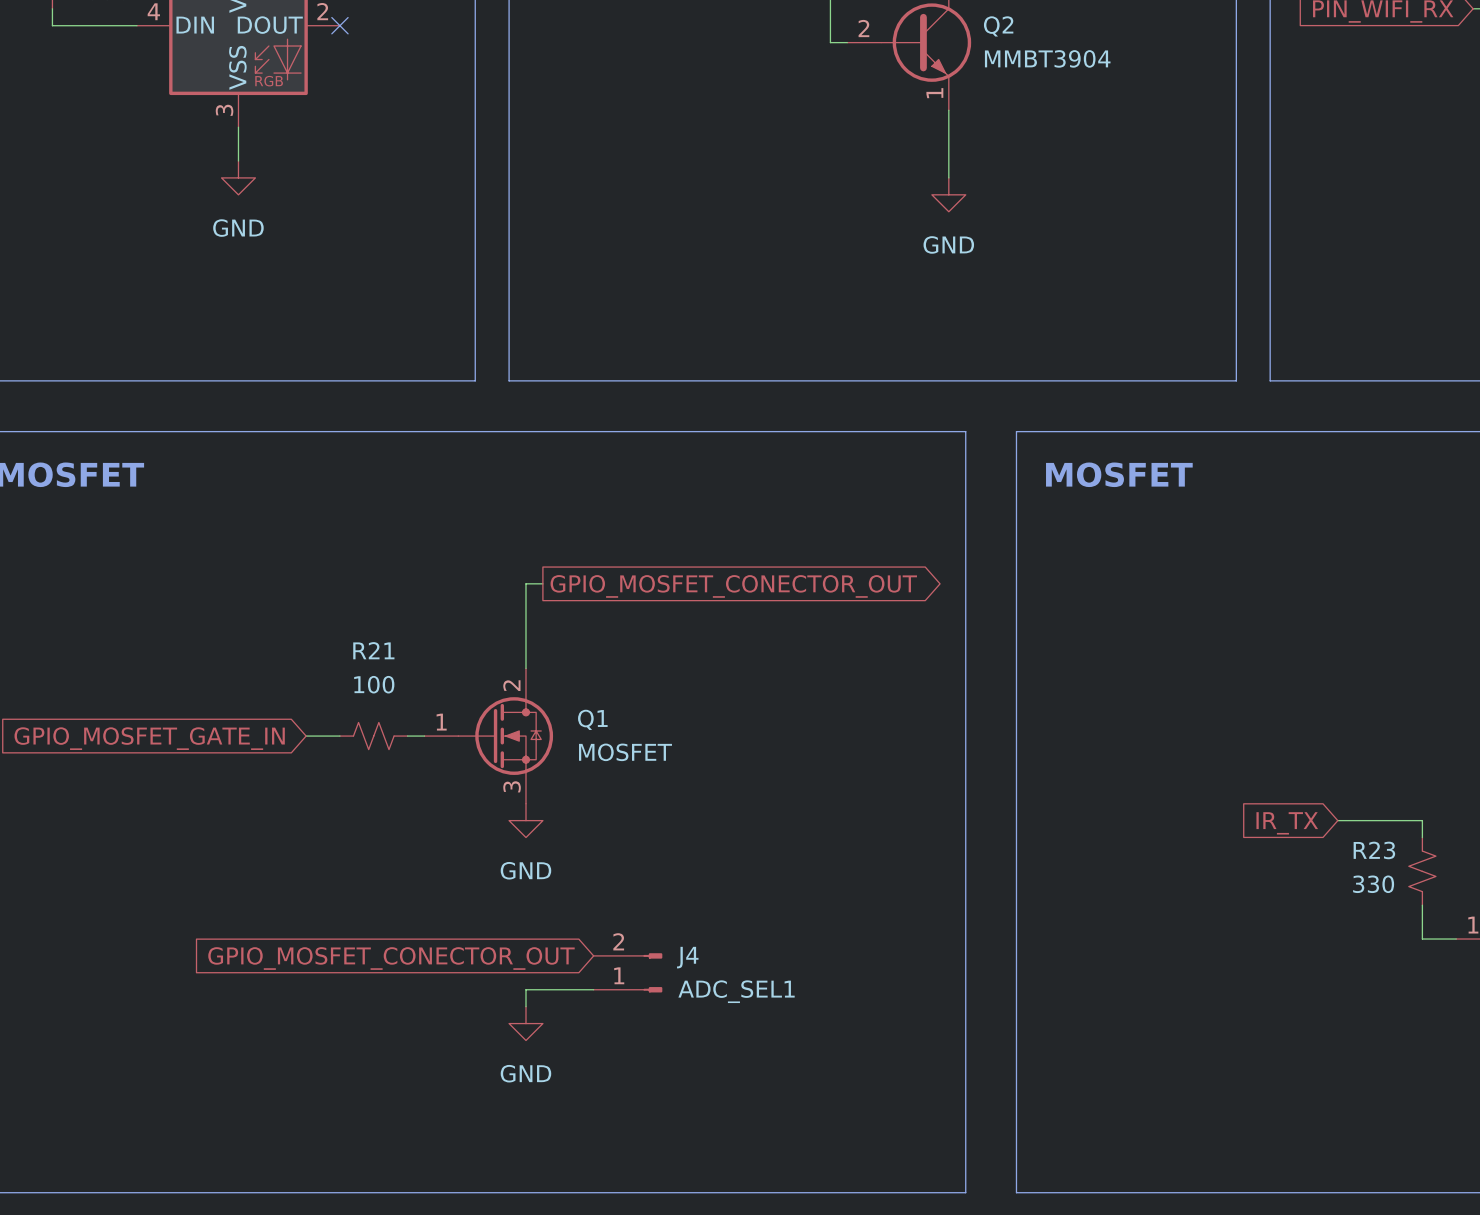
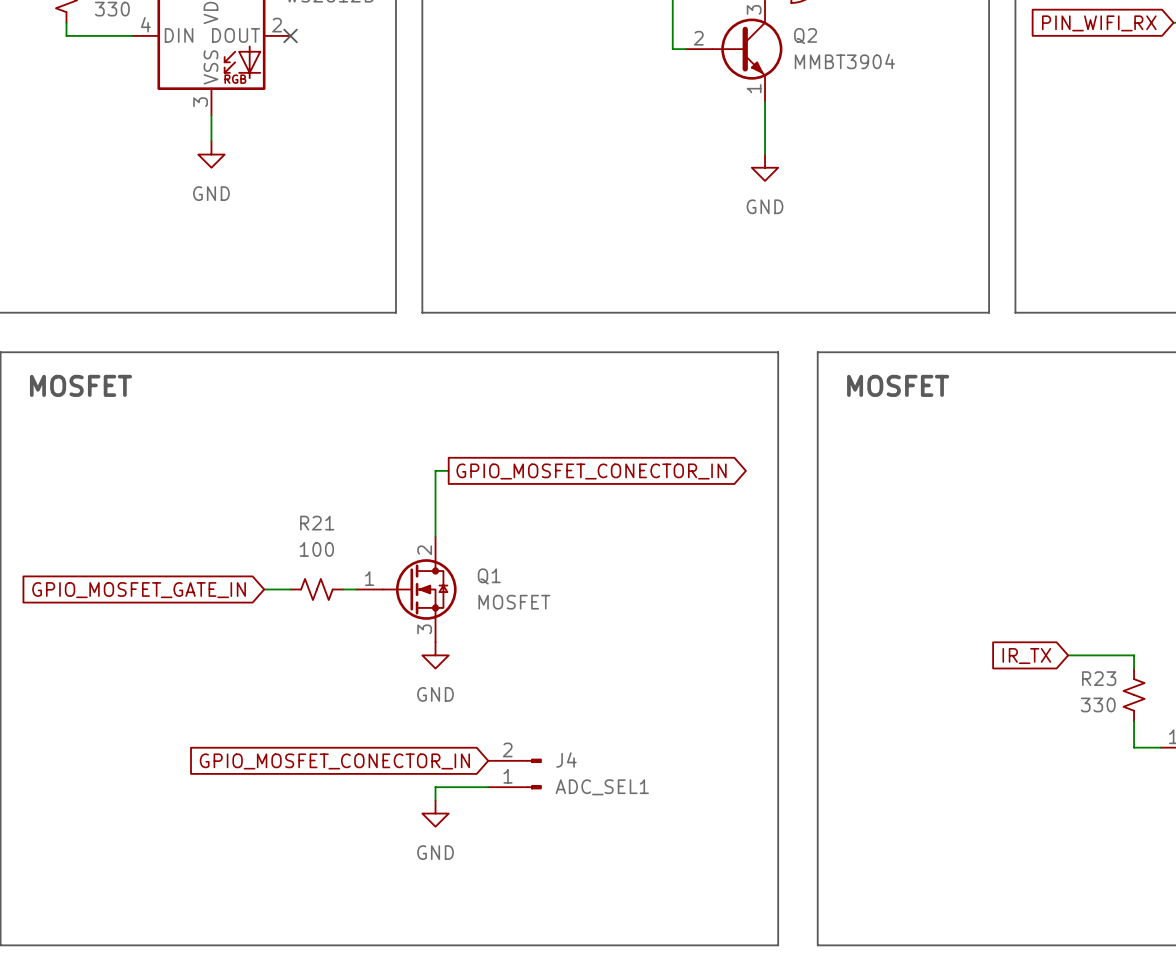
global label: GPIO_MOSFET_CONECTOR_OUT (733, 586) -> GPIO_MOSFET_CONECTOR_IN (591, 471)
global label: GPIO_MOSFET_CONECTOR_OUT (391, 958) -> GPIO_MOSFET_CONECTOR_IN (334, 761)

